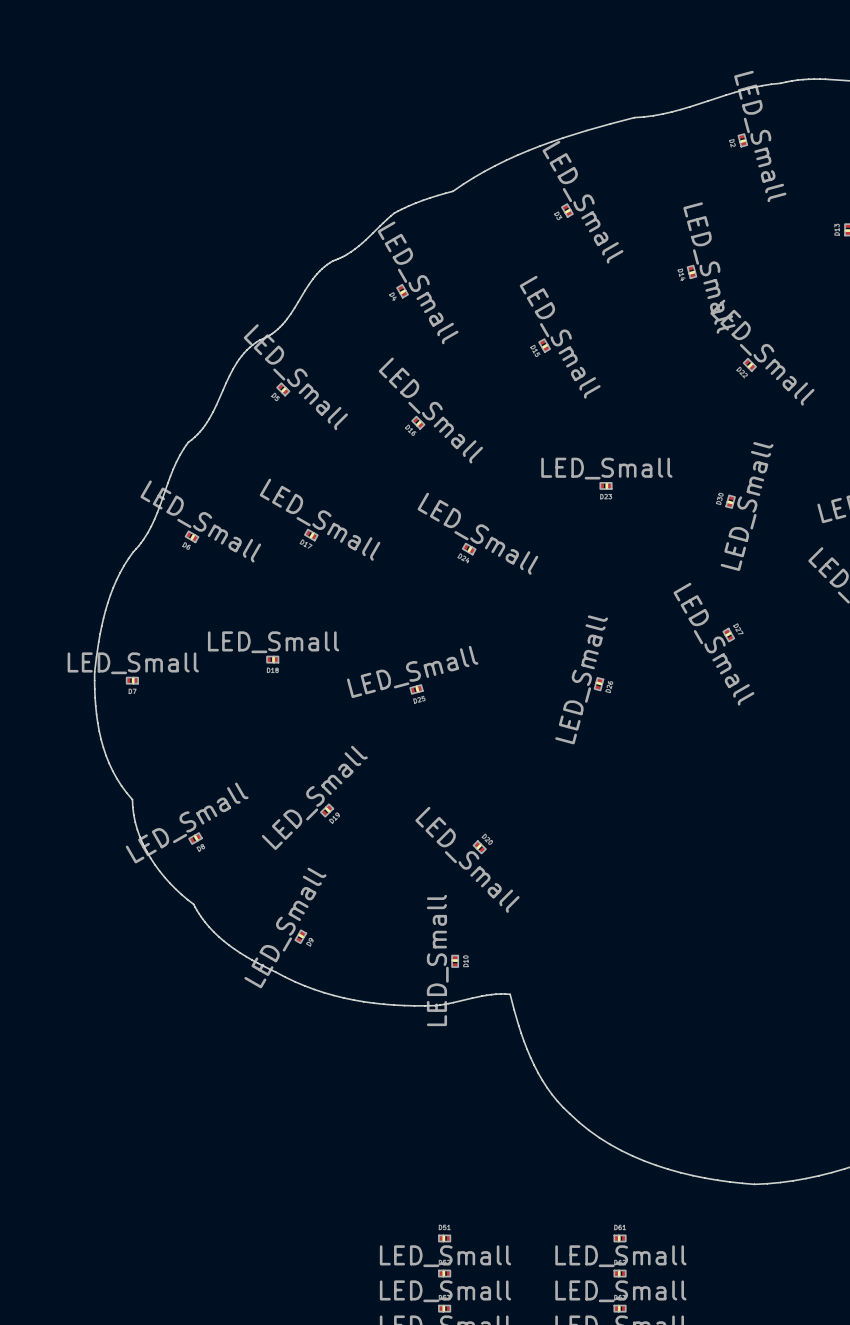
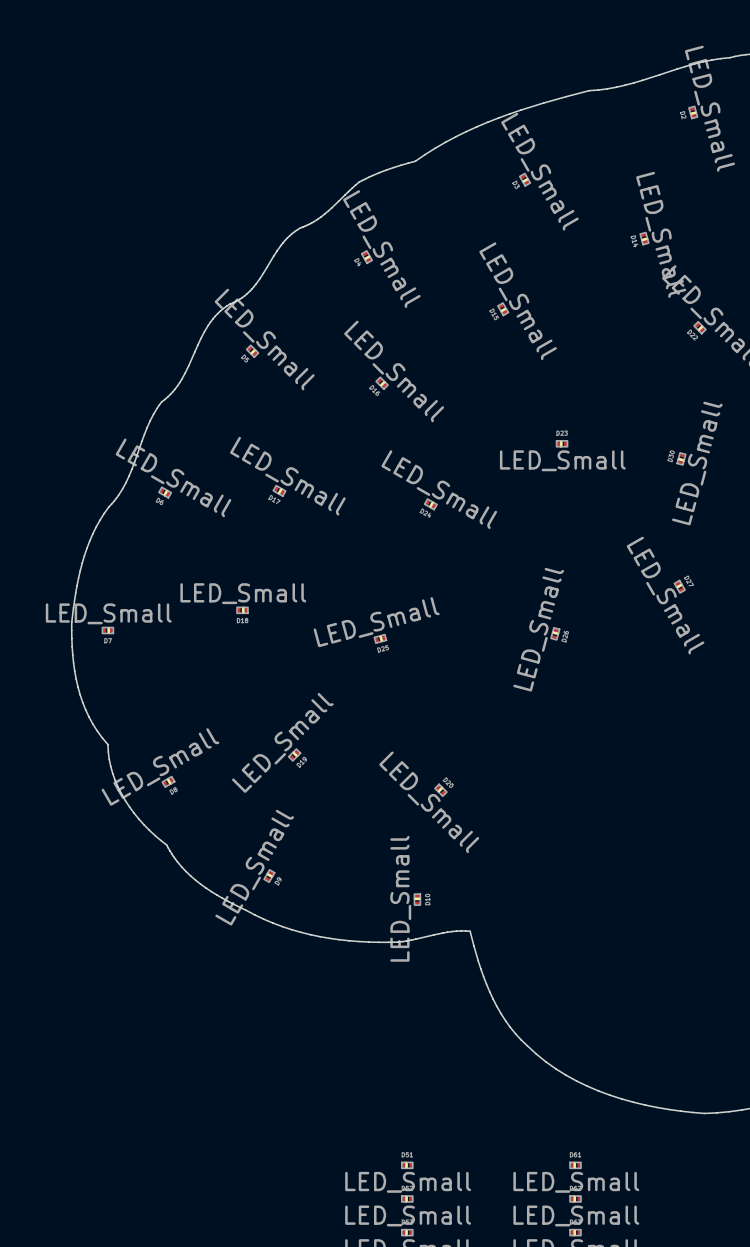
part rotation: 0° (606, 485) -> 180° (562, 443)

